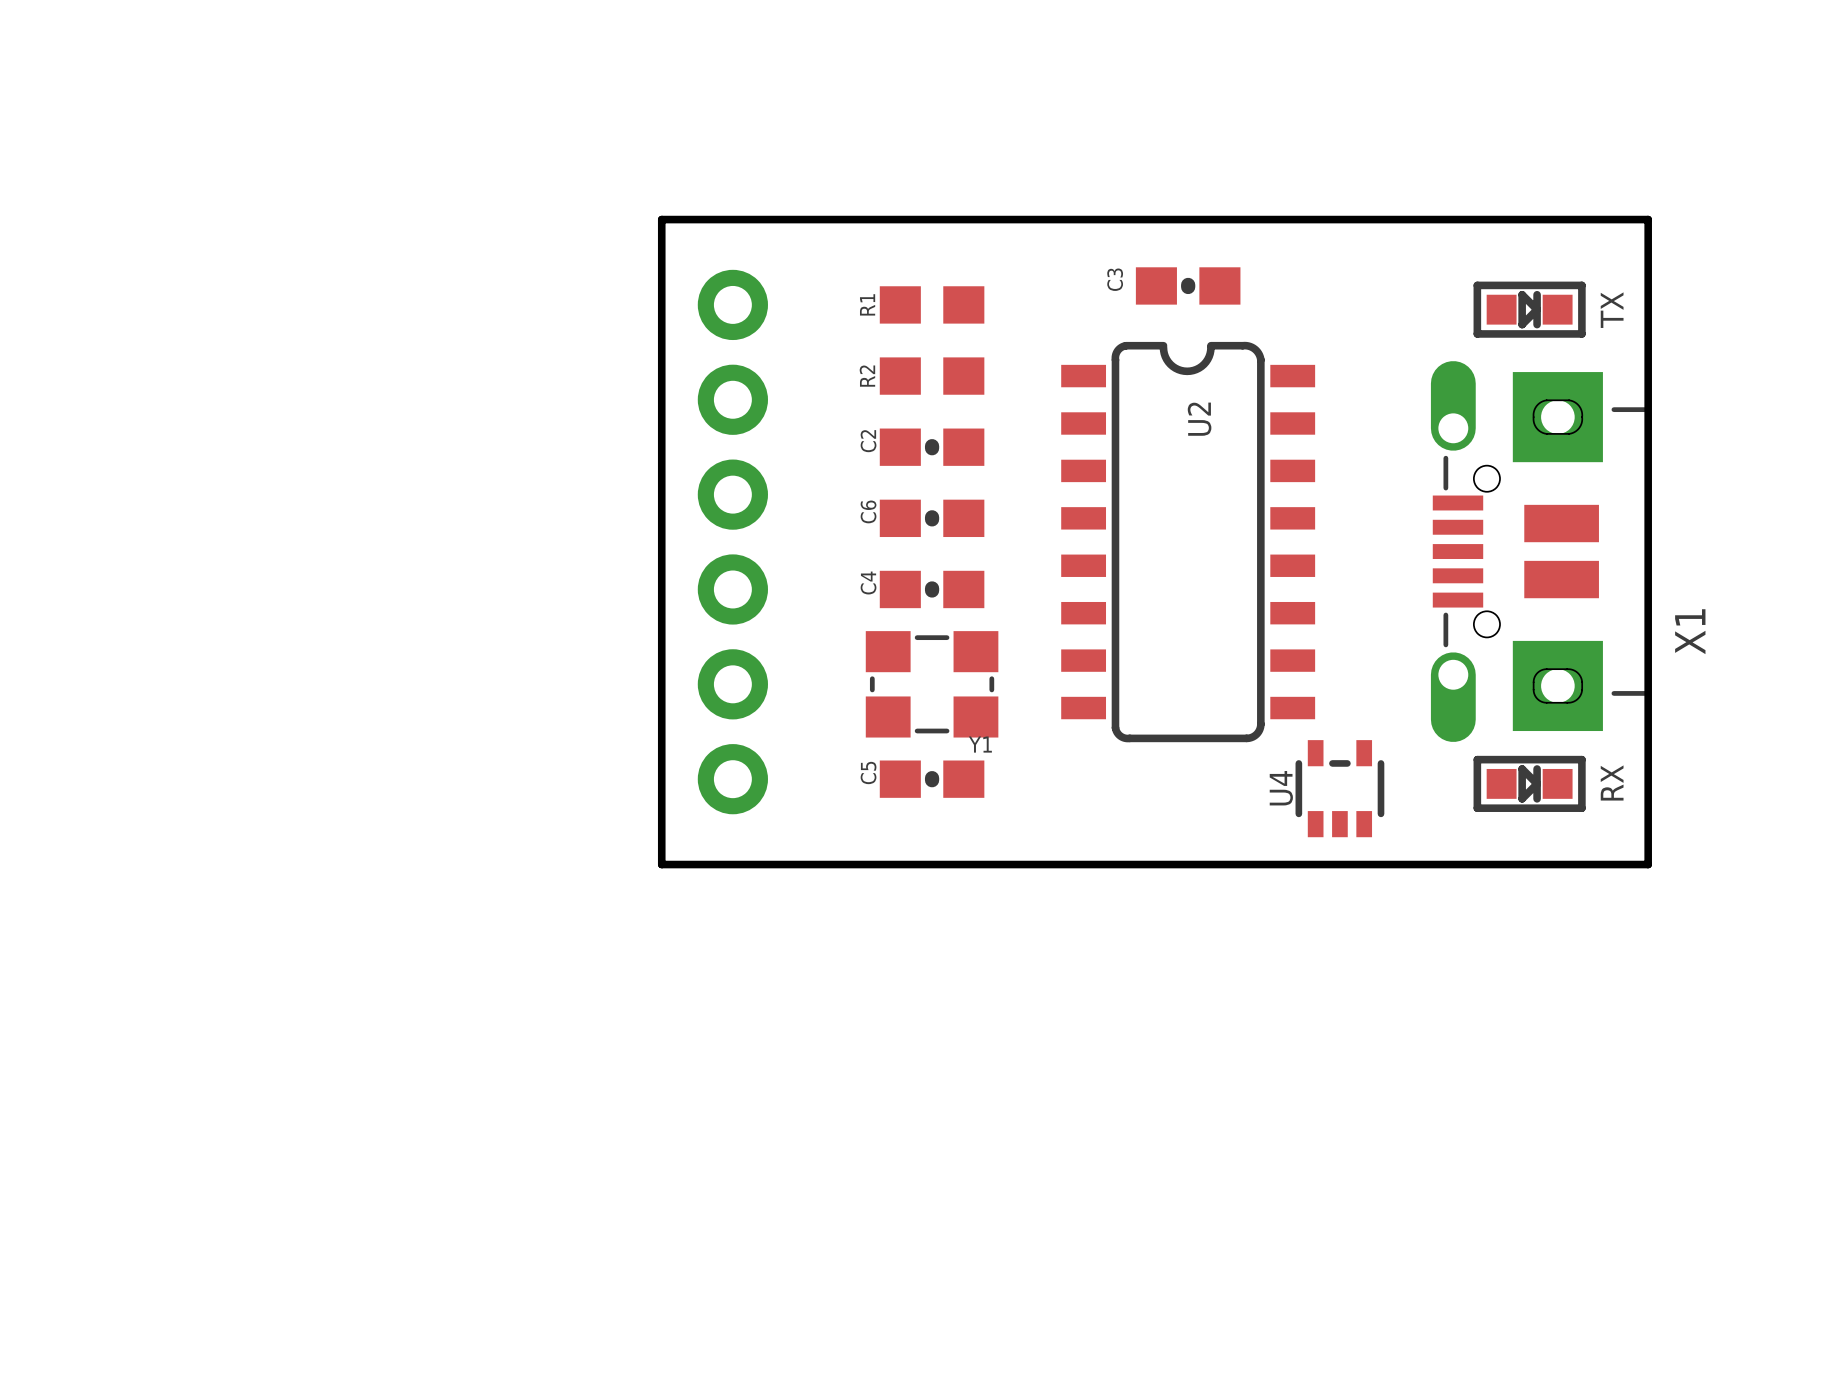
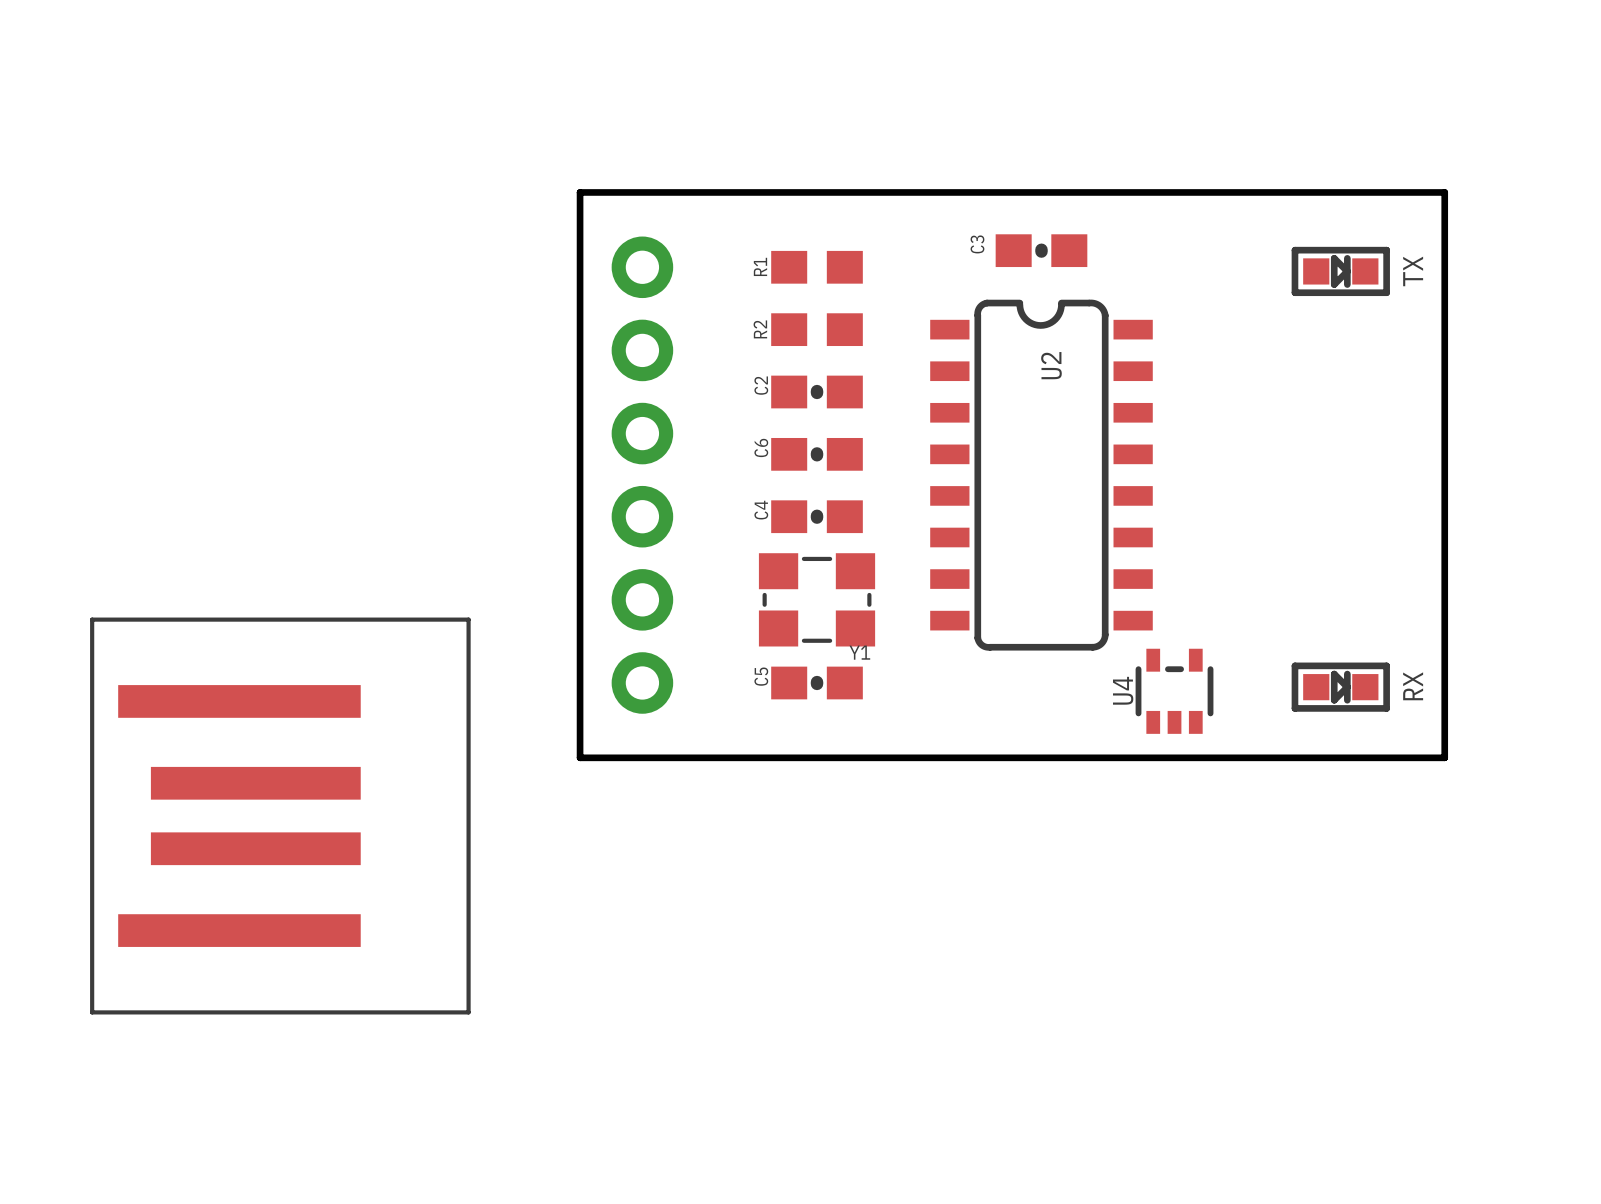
X1: (1540, 551) -> none
part: none -> (280, 816)

